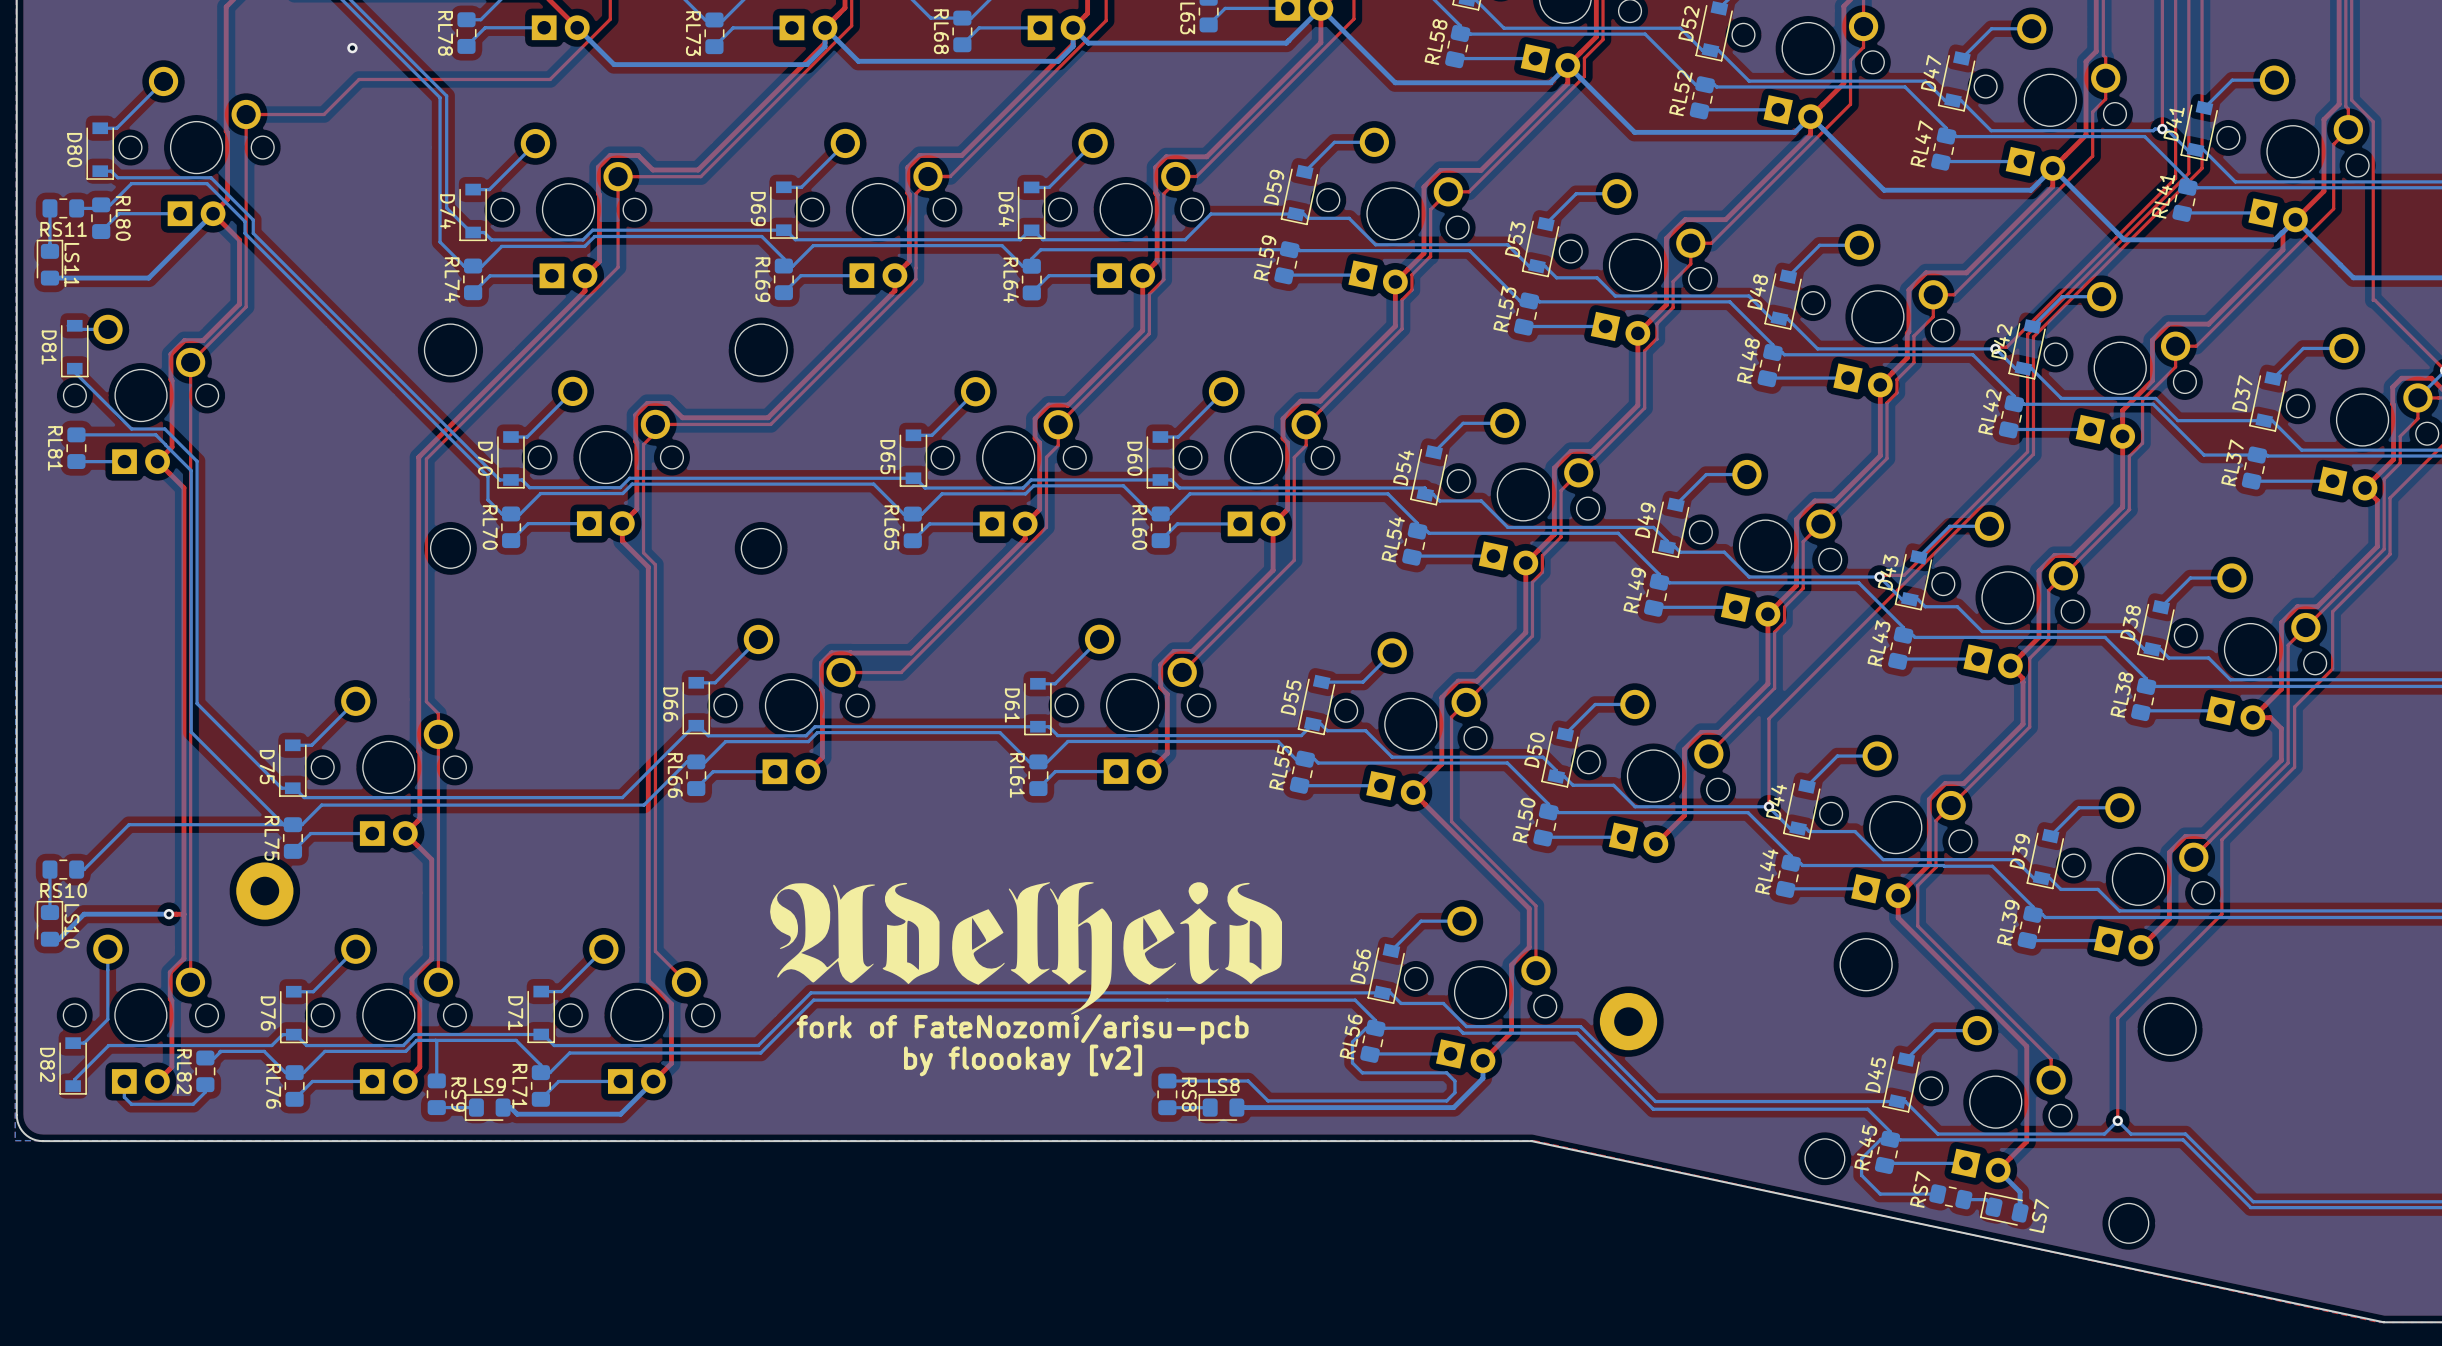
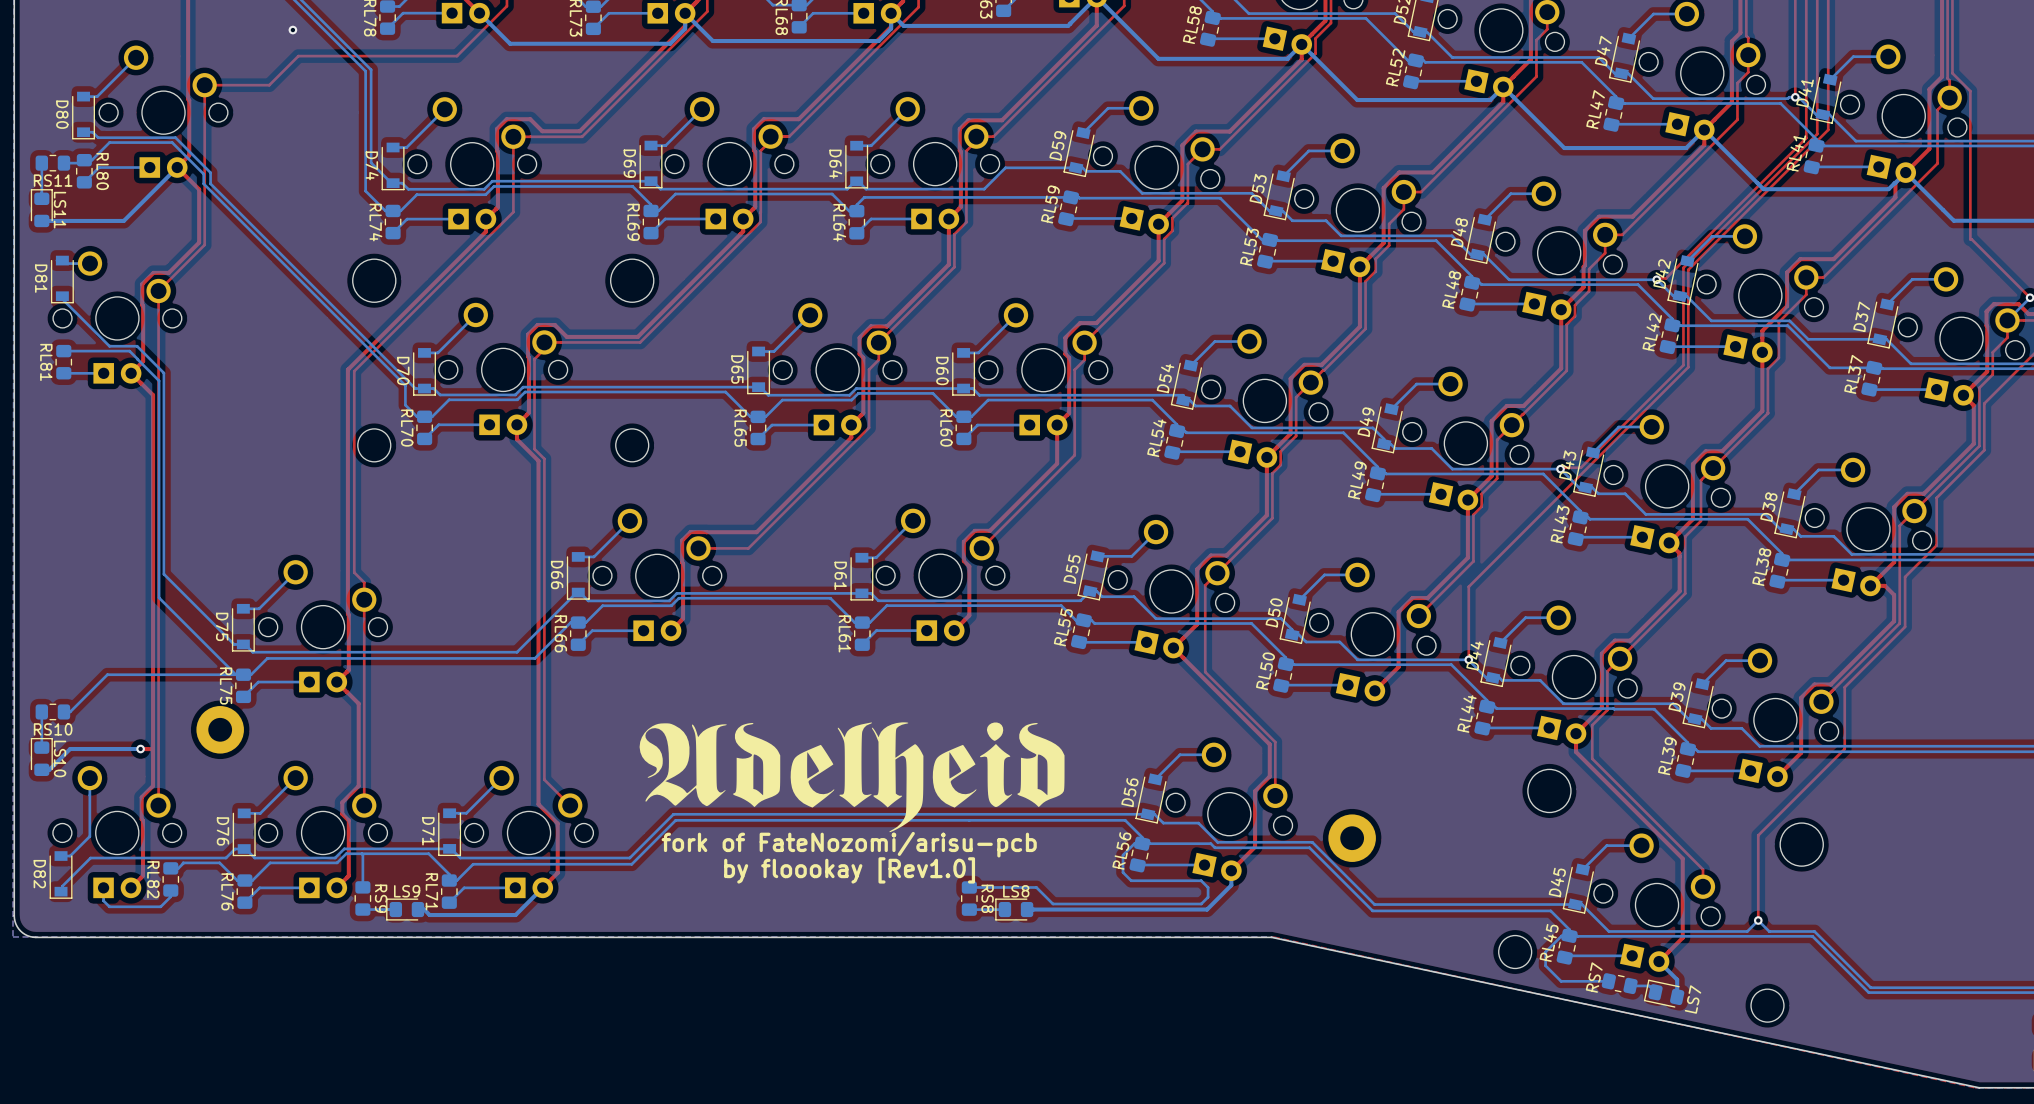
text: by floookay [v2] (1023, 1060) -> by floookay [Rev1.0] (849, 870)

